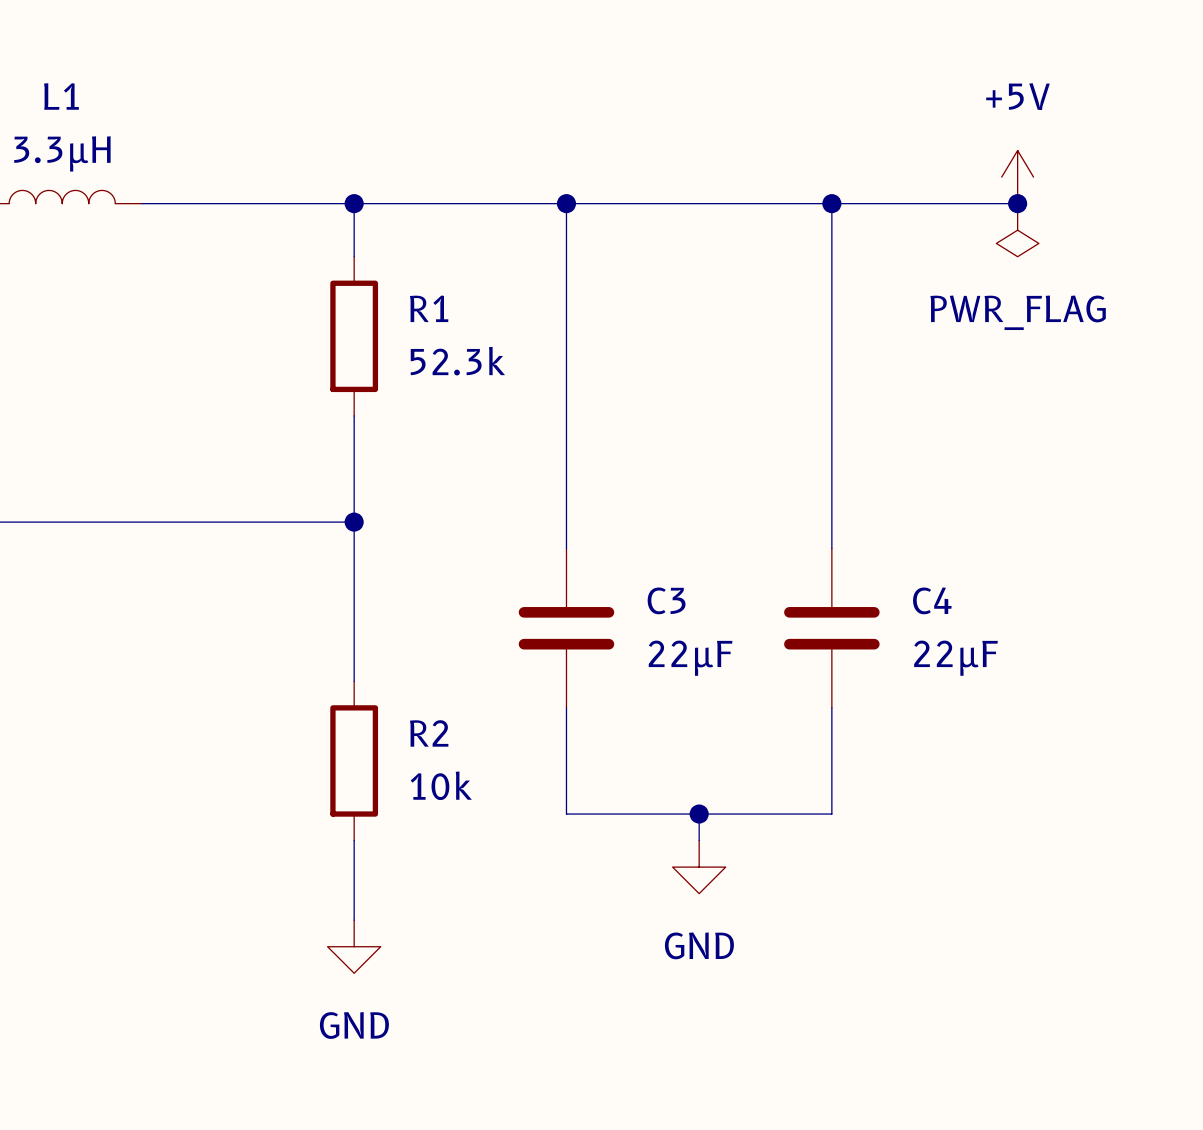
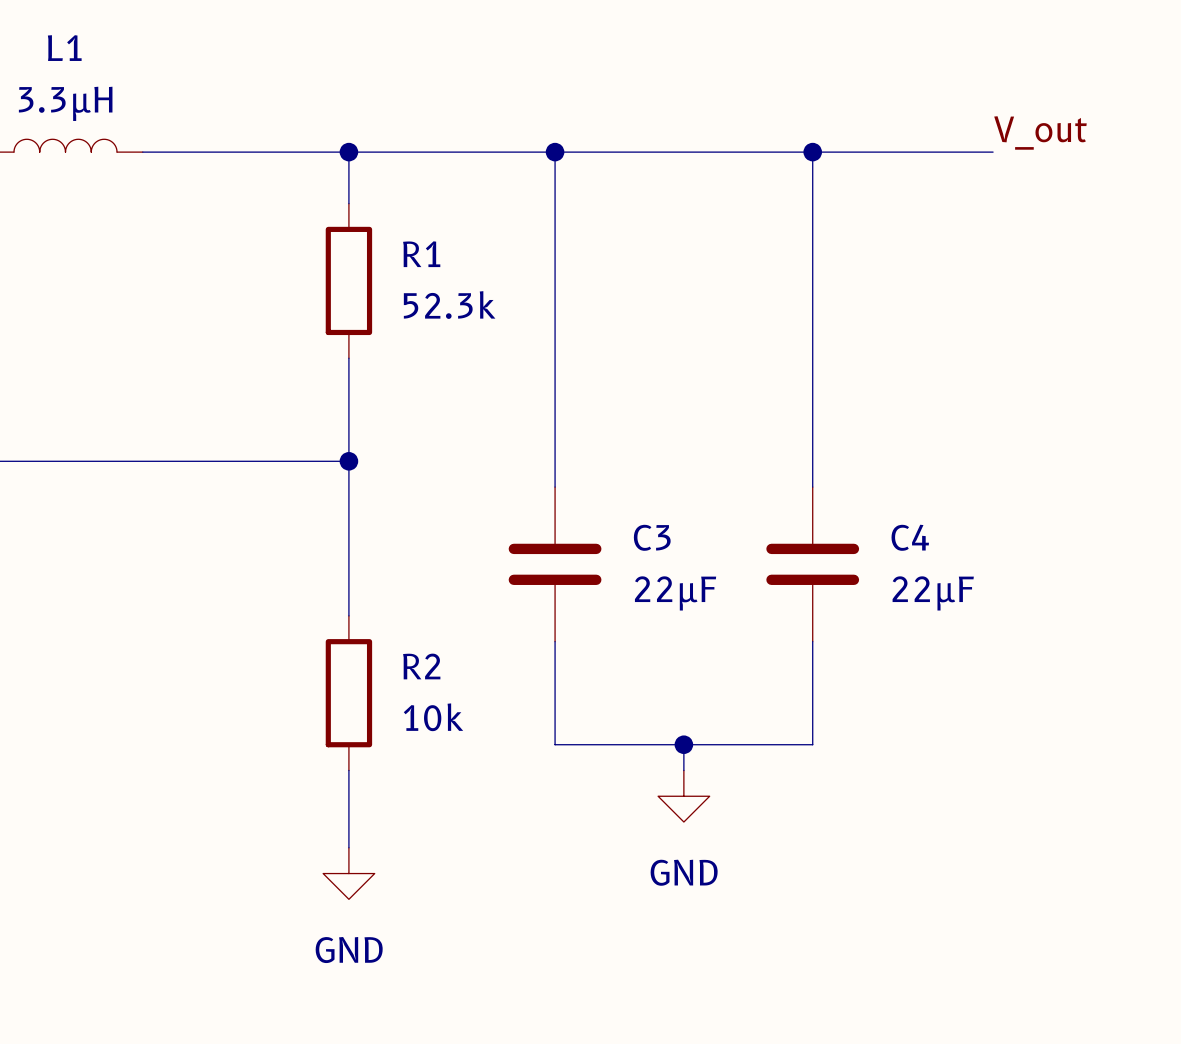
power symbol: +5V (1017, 177) -> none
label: none -> V_out (1040, 132)
junction: (1017, 203) -> none
power symbol: PWR_FLAG (1017, 230) -> none

